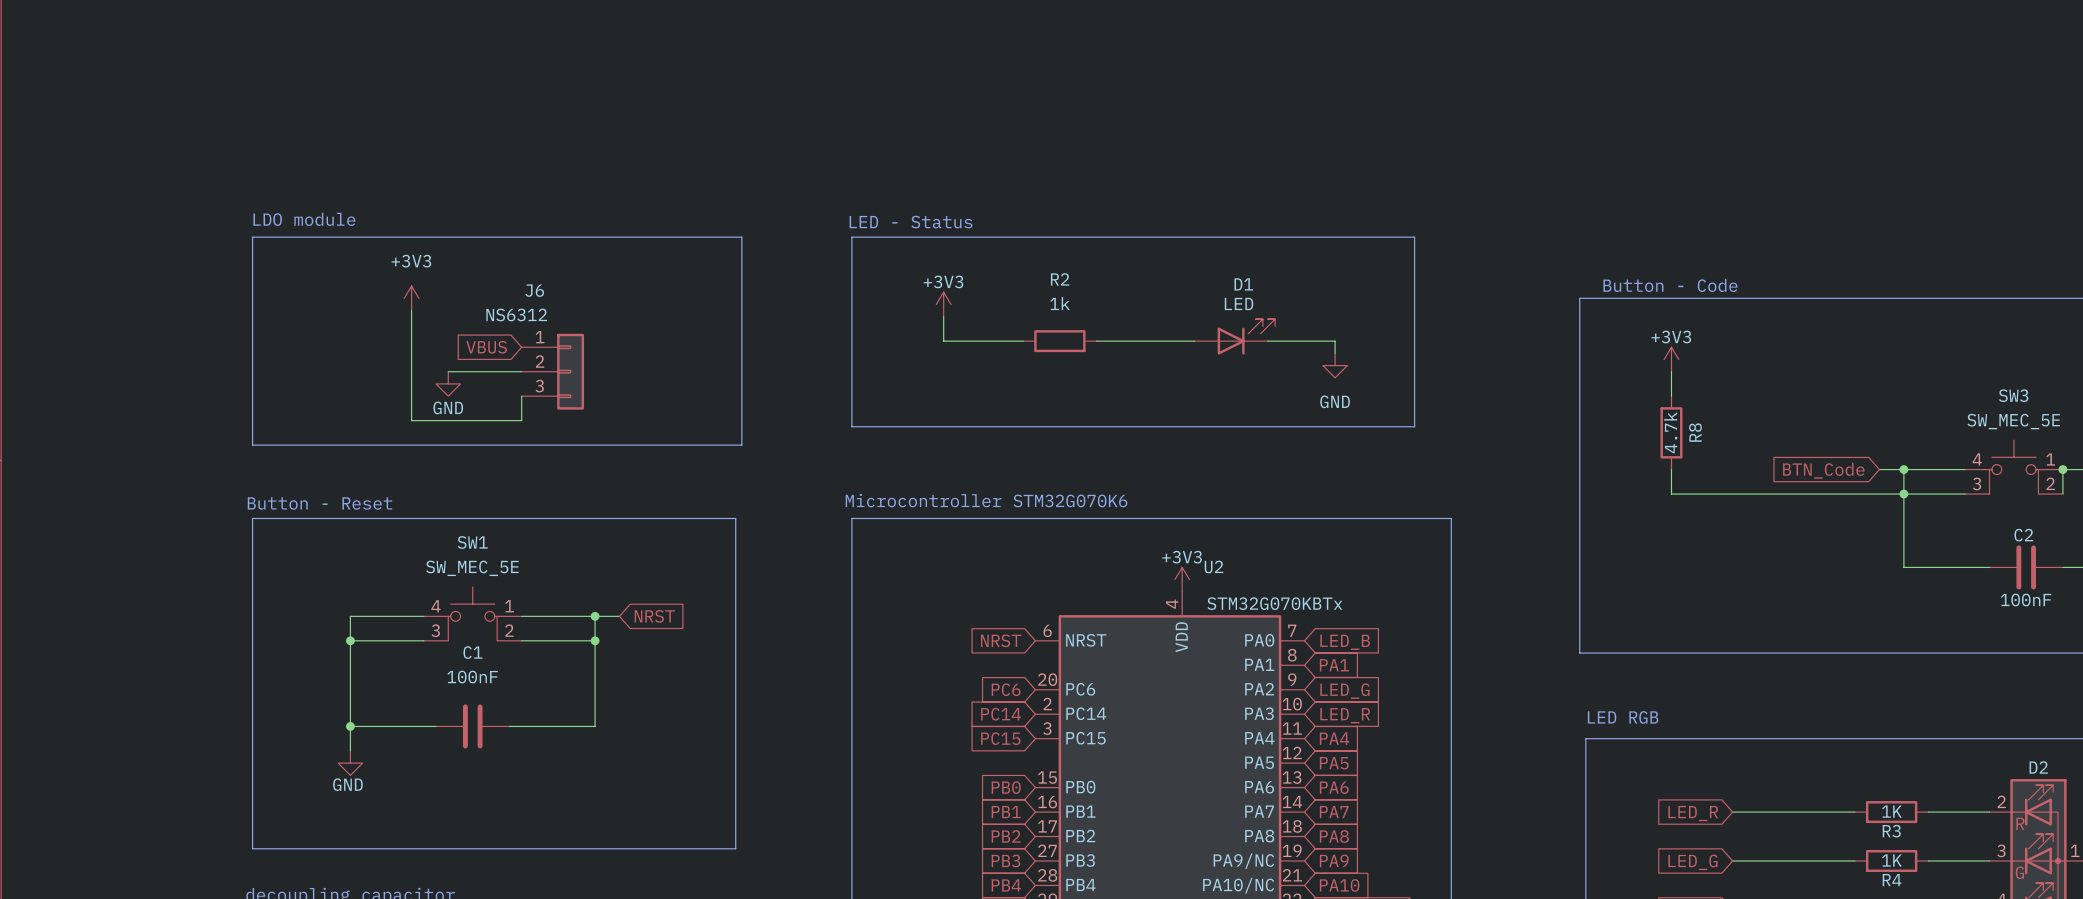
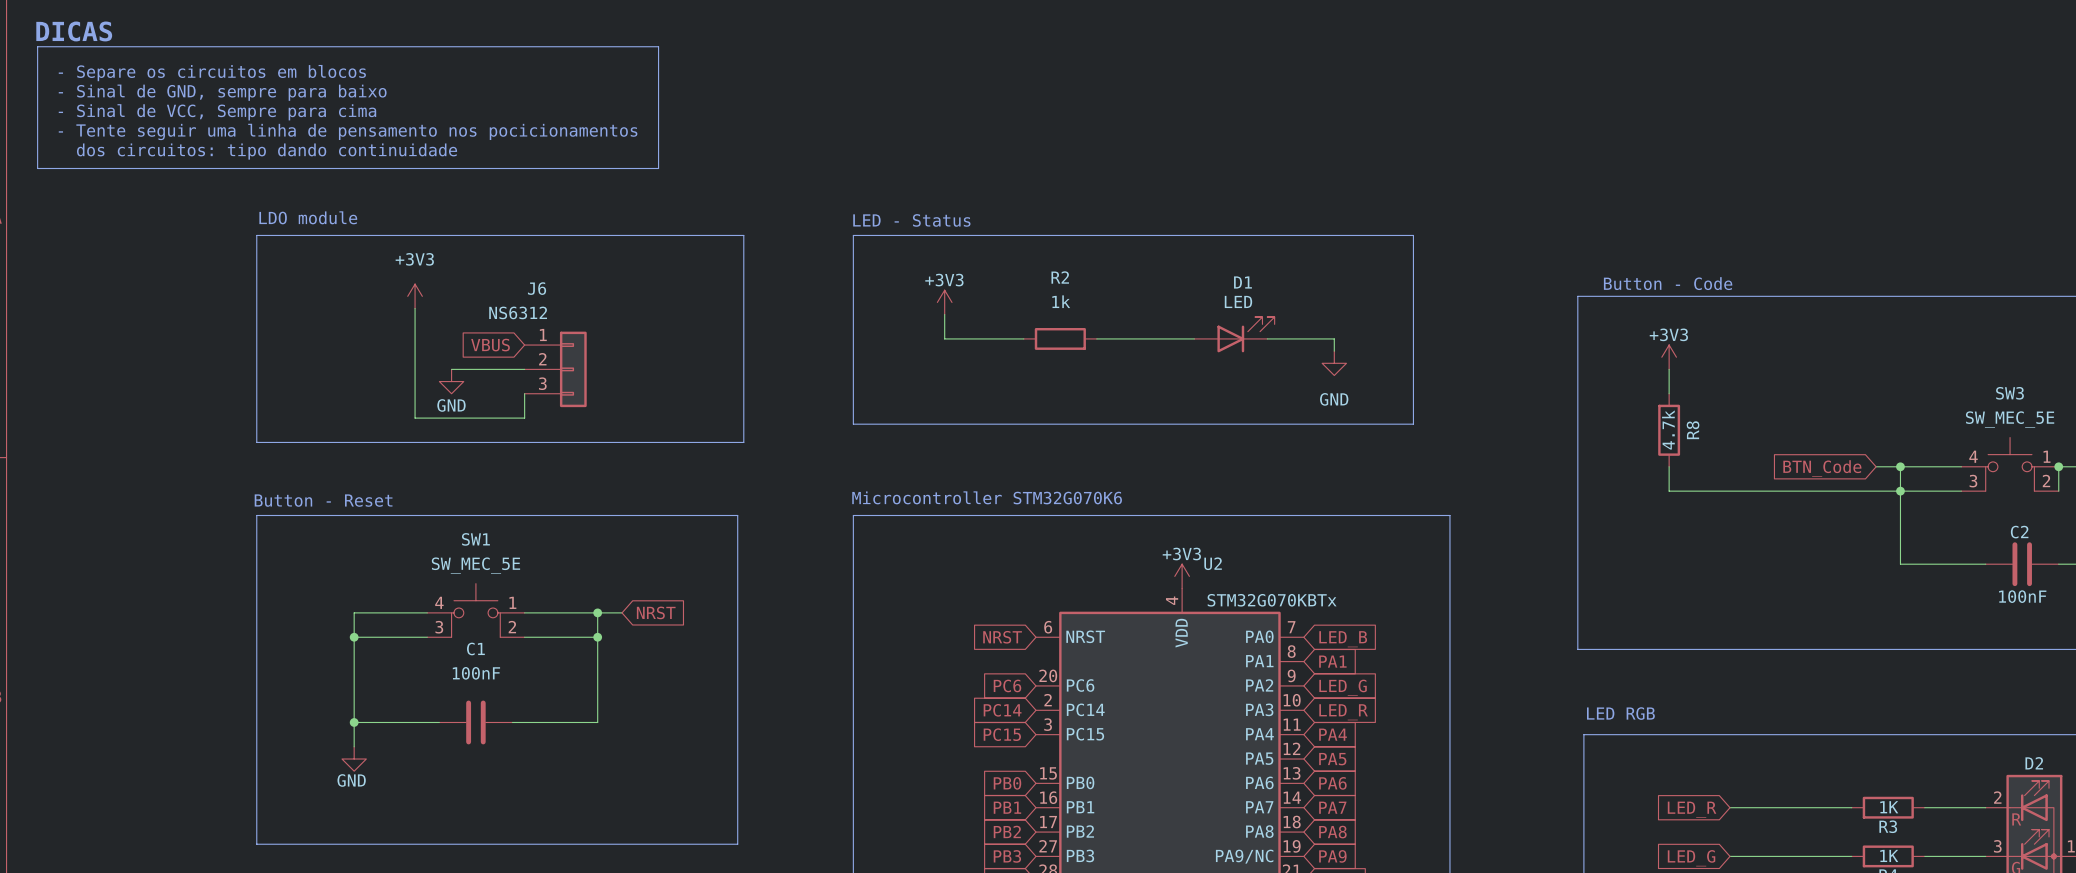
text: none -> DICAS (74, 31)
bus: none -> (37, 46) (658, 46) (658, 168) (37, 168) (37, 46)
text: none -> - Separe os circuitos em blocos (212, 73)
text: none -> - Sinal de GND, sempre para baixo (222, 92)
text: none -> - Sinal de VCC, Sempre para cima (217, 112)
text: none -> - Tente seguir uma linha de pensamento nos pocicionamentos (348, 131)
text: none -> dos circuitos: tipo dando continuidade (267, 151)

